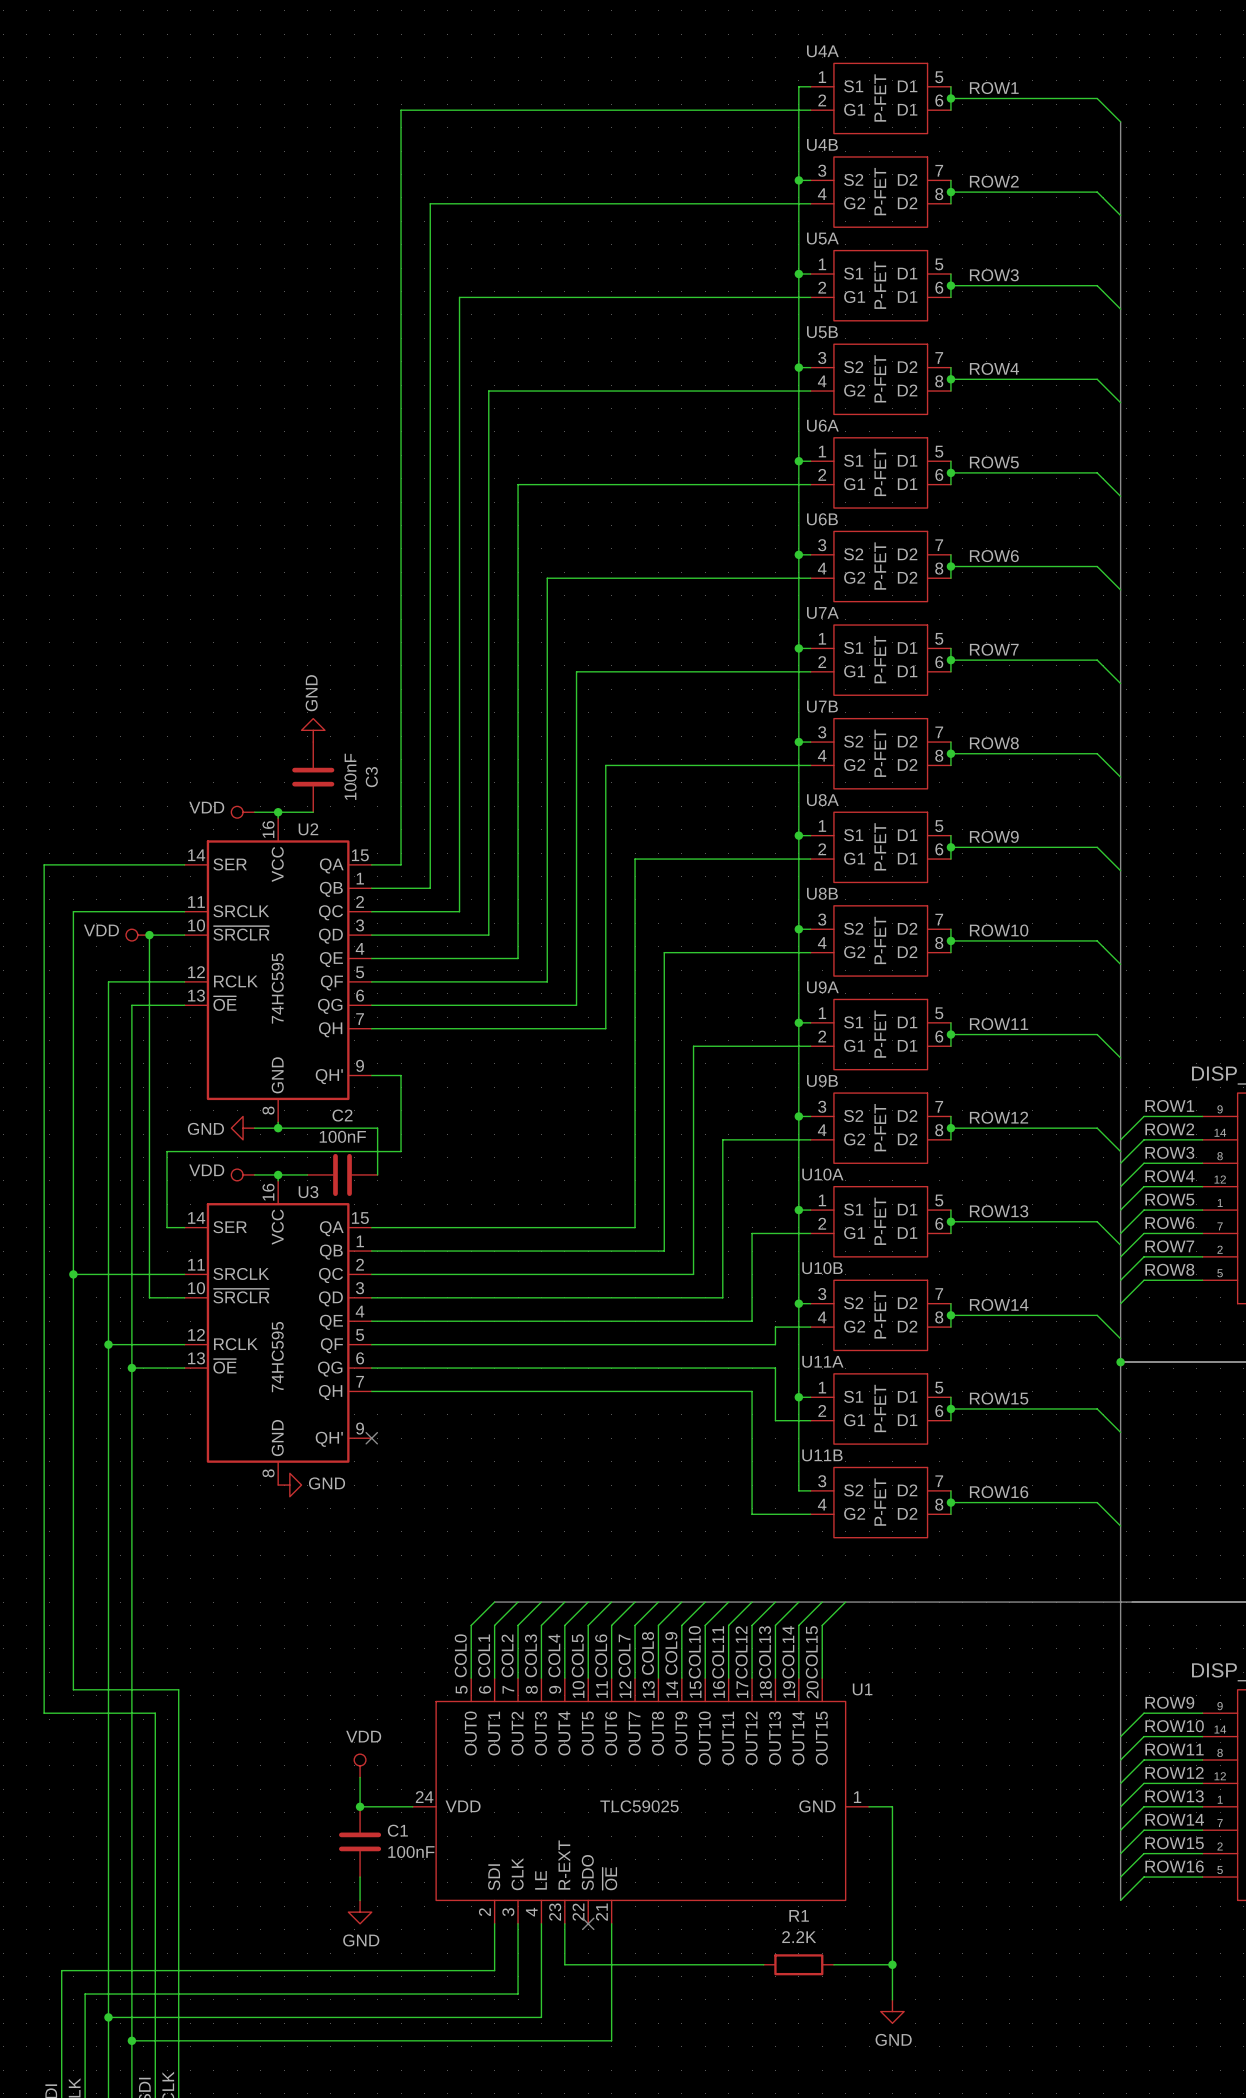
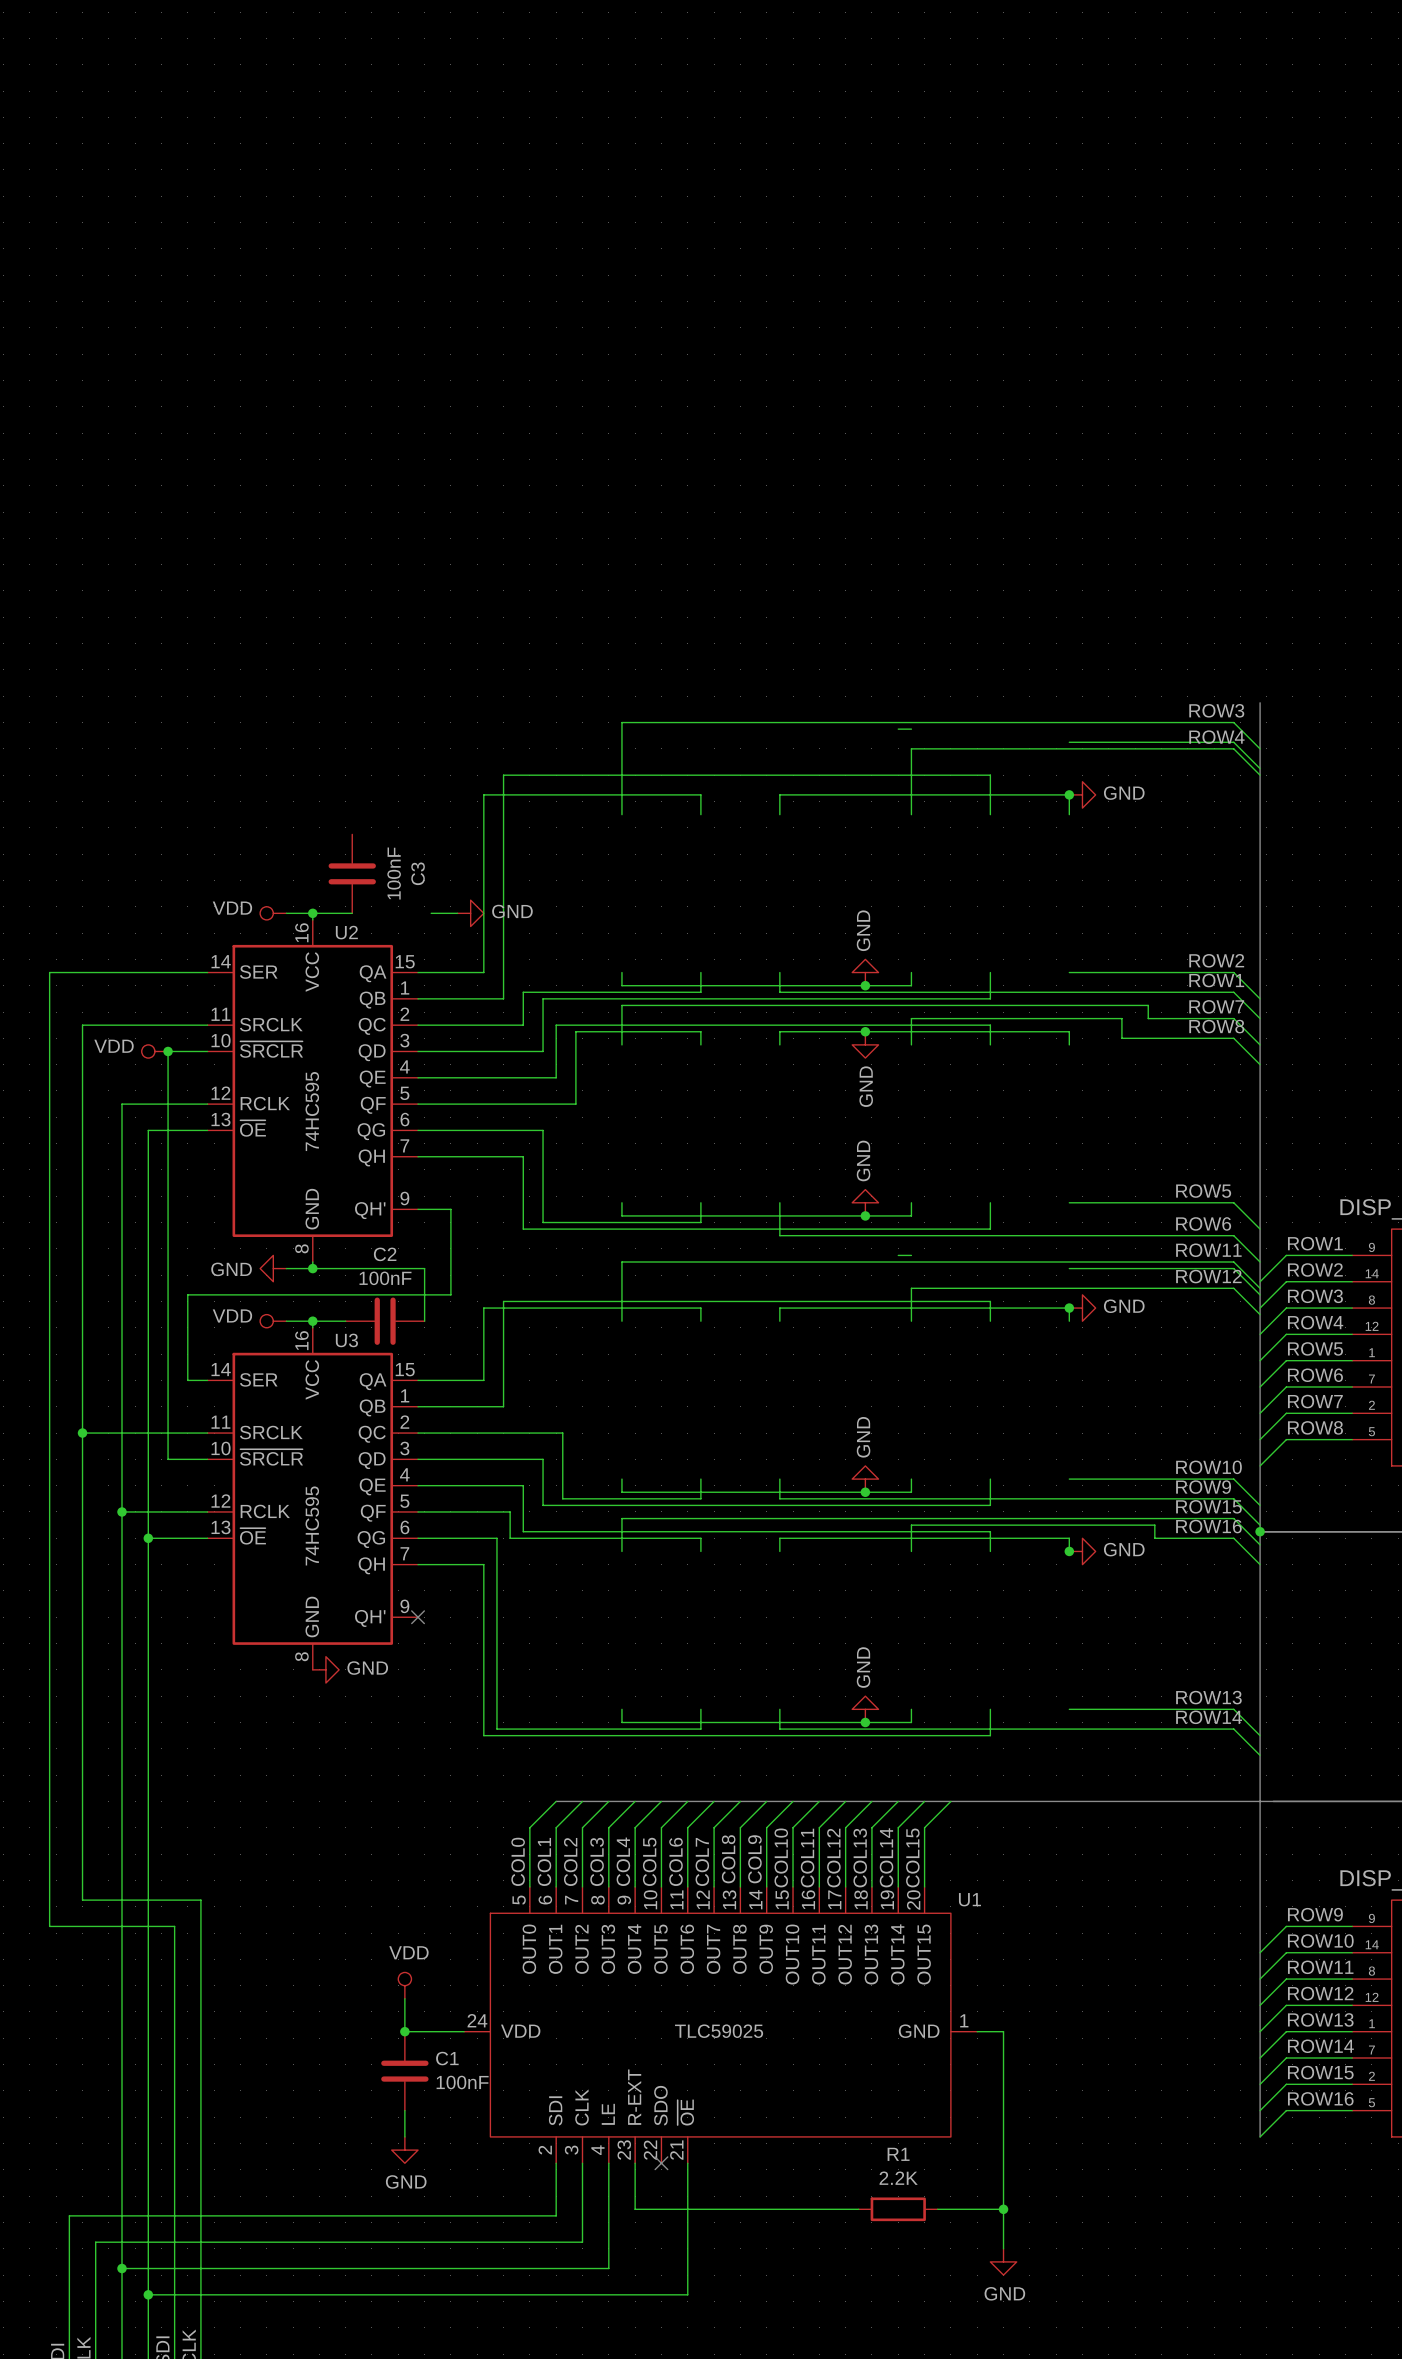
wire: (810, 86) (798, 86) (798, 1490) (810, 1490) -> none
wire: (950, 86) (950, 110) -> none
label: ROW1 (994, 88) -> none
U4A: P-FET (880, 98) -> none
wire: (950, 98) (1097, 98) (1120, 121) -> none
junction: (950, 98) -> none
wire: (810, 110) (401, 110) (401, 864) -> none
bus: (1120, 121) (1120, 625) -> none
wire: (798, 180) (810, 180) -> none
junction: (798, 180) -> none
wire: (950, 180) (950, 203) -> none
label: ROW2 (994, 181) -> none
U4B: P-FET (880, 192) -> none
wire: (950, 192) (1097, 192) (1120, 215) -> none
junction: (950, 192) -> none
wire: (810, 203) (430, 203) (430, 706) -> (700, 814) (700, 794) (483, 794)
wire: (798, 274) (810, 274) -> none
junction: (798, 274) -> none
wire: (950, 274) (950, 297) -> none
label: ROW3 (994, 275) -> none
U5A: P-FET (880, 285) -> none
wire: (950, 285) (1097, 285) (1120, 309) -> none
junction: (950, 285) -> none
wire: (810, 297) (459, 297) (459, 911) -> (700, 972) (700, 992) (523, 992) (523, 1025) (516, 1025)
wire: (798, 367) (810, 367) -> none
junction: (798, 367) -> none
wire: (950, 367) (950, 391) -> none
label: ROW4 (994, 368) -> none
U5B: P-FET (880, 379) -> none
wire: (950, 379) (1097, 379) (1120, 402) -> none
junction: (950, 379) -> none
wire: (810, 391) (488, 391) (488, 935) (482, 935) -> (990, 972) (990, 998) (543, 998) (543, 1051)
wire: (798, 461) (810, 461) -> none
junction: (798, 461) -> none
wire: (950, 461) (950, 484) -> none
label: ROW5 (994, 462) -> none
U6A: P-FET (880, 472) -> none
wire: (950, 472) (1097, 472) (1120, 496) -> none
junction: (950, 472) -> none
wire: (810, 484) (518, 484) (518, 958) (494, 958) -> (990, 1044) (990, 1025) (556, 1025) (556, 1077)
wire: (798, 554) (810, 554) -> none
junction: (798, 554) -> none
wire: (950, 554) (950, 578) -> none
label: ROW6 (994, 556) -> none
U6B: P-FET (880, 566) -> none
wire: (950, 566) (1097, 566) (1120, 589) -> none
junction: (950, 566) -> none
wire: (810, 578) (547, 578) (547, 981) (512, 981) -> (700, 1044) (700, 1031) (575, 1031) (575, 1104)
label: none -> ROW3 (1216, 710)
junction: (798, 648) -> none
wire: (950, 648) (950, 671) -> none
label: ROW7 (994, 649) -> none
label: none -> ROW4 (1216, 737)
U7A: P-FET (880, 660) -> none
junction: (950, 660) -> none
wire: none -> (1260, 748) (1233, 722) (621, 722) (621, 814)
wire: (810, 671) (576, 671) (576, 1005) (482, 1005) -> (700, 1202) (700, 1222) (543, 1222) (543, 1130)
wire: none -> (1260, 775) (1233, 748) (911, 748) (911, 814)
junction: none -> (1069, 794)
power symbol: none -> GND (1082, 794)
wire: none -> (779, 814) (779, 794) (1069, 794) (1069, 814)
wire: none -> (990, 814) (990, 775) (503, 775) (503, 998) (483, 998)
power symbol rotation: 0° (313, 730) -> 90° clockwise (470, 913)
power symbol position: GND (313, 730) -> GND (470, 913)
wire: (798, 742) (810, 742) -> none
junction: (798, 742) -> none
wire: (950, 742) (950, 765) -> none
label position: ROW8 (994, 743) -> ROW8 (1216, 1026)
U7B: P-FET (880, 753) -> none
wire: (950, 753) (1097, 753) (1120, 777) -> none
junction: (950, 753) -> none
wire: (810, 765) (605, 765) (605, 1028) (465, 1028) -> (990, 1202) (990, 1229) (523, 1229) (523, 1156)
wire: none -> (431, 913) (457, 913)
wire: (798, 835) (810, 835) -> none
junction: (798, 835) -> none
wire: (950, 835) (950, 859) -> none
label: ROW9 (994, 836) -> none
U8A: P-FET (880, 847) -> none
wire: (950, 847) (1097, 847) (1120, 870) -> (1069, 972) (1233, 972) (1260, 998)
junction: (950, 847) -> none
label: none -> ROW2 (1216, 960)
wire: (810, 859) (635, 859) (635, 1227) (430, 1227) -> (700, 1321) (700, 1308) (483, 1308) (483, 1380)
wire: (430, 864) (430, 888) -> (483, 972) (450, 972)
wire: none -> (621, 972) (621, 985) (911, 985) (911, 972)
wire: none -> (779, 972) (779, 992) (1233, 992) (1260, 1018)
power symbol: none -> GND (865, 972)
label: none -> ROW1 (1216, 980)
junction: none -> (865, 985)
label: none -> ROW7 (1216, 1006)
junction: none -> (865, 1031)
wire: none -> (621, 1044) (621, 1005) (1148, 1005) (1148, 1018) (1233, 1018) (1260, 1044)
power symbol: none -> GND (865, 1044)
wire: (798, 929) (810, 929) -> (1260, 1064) (1233, 1038) (1121, 1038) (1121, 1018) (911, 1018) (911, 1044)
junction: (798, 929) -> none
wire: (950, 929) (950, 952) -> (1069, 1044) (1069, 1031) (779, 1031) (779, 1044)
label: ROW10 (999, 930) -> none
U8B: P-FET (880, 940) -> none
wire: (950, 940) (1097, 940) (1120, 964) -> none
junction: (950, 940) -> none
wire: (810, 952) (664, 952) (664, 1251) (447, 1251) -> (990, 1321) (990, 1301) (503, 1301) (503, 1406)
wire: (798, 1022) (810, 1022) -> none
junction: (798, 1022) -> none
wire: (950, 1022) (950, 1046) -> none
label position: ROW11 (999, 1024) -> ROW11 (1208, 1250)
U9A: P-FET (880, 1034) -> none
wire: (950, 1034) (1097, 1034) (1120, 1057) -> (1069, 1202) (1233, 1202) (1260, 1229)
junction: (950, 1034) -> none
wire: (810, 1046) (693, 1046) (693, 1069) -> none
label: none -> ROW5 (1203, 1191)
wire: none -> (621, 1202) (621, 1215) (911, 1215) (911, 1202)
power symbol: none -> GND (865, 1202)
junction: none -> (865, 1215)
label: none -> ROW6 (1203, 1223)
wire: (693, 1098) (693, 1163) -> (1069, 1321) (1069, 1308) (779, 1308)
wire: none -> (779, 1235) (1233, 1235) (1260, 1261)
junction: (798, 1116) -> none
wire: (950, 1116) (950, 1139) -> none
label position: ROW12 (999, 1117) -> ROW12 (1208, 1276)
U9B: P-FET (880, 1128) -> none
junction: (950, 1128) -> none
wire: (810, 1139) (722, 1139) (722, 1297) (482, 1297) -> (990, 1479) (990, 1505) (543, 1505) (543, 1459)
wire: none -> (1260, 1288) (1233, 1261) (621, 1261) (621, 1321)
junction: none -> (1069, 1308)
power symbol: none -> GND (1082, 1308)
wire: none -> (1260, 1314) (1233, 1288) (911, 1288) (911, 1321)
wire: (693, 1174) (693, 1274) (500, 1274) -> (700, 1479) (700, 1498) (562, 1498) (562, 1433)
wire: (798, 1210) (810, 1210) -> none
junction: (798, 1210) -> none
wire: (950, 1210) (950, 1233) -> none
label: ROW13 (999, 1211) -> none
U10A: P-FET (880, 1221) -> none
wire: (950, 1221) (1097, 1221) (1120, 1245) -> none
junction: (950, 1221) -> none
wire: (810, 1233) (752, 1233) (752, 1321) (465, 1321) -> (990, 1551) (990, 1531) (523, 1531) (523, 1485)
wire: (798, 1303) (810, 1303) -> none
junction position: (798, 1303) -> (865, 1492)
wire: (950, 1303) (950, 1327) -> none
label: ROW14 (999, 1304) -> none
label: none -> ROW10 (1208, 1467)
wire: none -> (779, 1479) (779, 1498) (1233, 1498) (1260, 1525)
power symbol: none -> GND (865, 1479)
wire: none -> (911, 1479) (911, 1492)
U10B: P-FET (880, 1315) -> none
junction: (950, 1315) -> none
label: none -> ROW9 (1203, 1487)
wire: (775, 1327) (775, 1344) (453, 1344) -> (871, 1492) (621, 1492) (621, 1479)
wire: (441, 1368) (453, 1368) -> (510, 1511) (510, 1538)
wire: none -> (496, 1538) (496, 1729) (700, 1729) (700, 1709)
wire: (623, 1368) (693, 1368) -> (700, 1538) (700, 1551)
wire: none -> (779, 1538) (779, 1551)
wire: (775, 1368) (775, 1420) (810, 1420) -> (871, 1538) (1069, 1538) (1069, 1551)
wire: none -> (1260, 1544) (1233, 1518) (621, 1518) (621, 1551)
wire: none -> (911, 1551) (911, 1525) (1154, 1525) (1154, 1538) (1233, 1538) (1260, 1564)
power symbol: none -> GND (1082, 1551)
wire: (430, 1391) (752, 1391) (752, 1514) (810, 1514) -> (483, 1564) (483, 1735) (990, 1735) (990, 1709)
wire: (798, 1397) (810, 1397) -> none
junction: (798, 1397) -> none
wire: (950, 1397) (950, 1420) -> none
label position: ROW15 (999, 1398) -> ROW15 (1208, 1506)
U11A: P-FET (880, 1408) -> none
wire: (950, 1408) (1097, 1408) (1120, 1432) -> none
junction position: (950, 1408) -> (1069, 1551)
wire: (950, 1490) (950, 1514) -> none
label position: ROW16 (999, 1492) -> ROW16 (1208, 1526)
U11B: P-FET (880, 1502) -> none
wire: (950, 1502) (1097, 1502) (1120, 1525) -> (1069, 1709) (1233, 1709) (1260, 1735)
junction: (950, 1502) -> none
label: none -> ROW13 (1208, 1697)
wire: none -> (621, 1709) (621, 1722) (911, 1722) (911, 1709)
wire: none -> (779, 1709) (779, 1729) (1233, 1729) (1260, 1755)
power symbol: none -> GND (865, 1709)
label: none -> ROW14 (1209, 1717)
junction: none -> (865, 1722)

